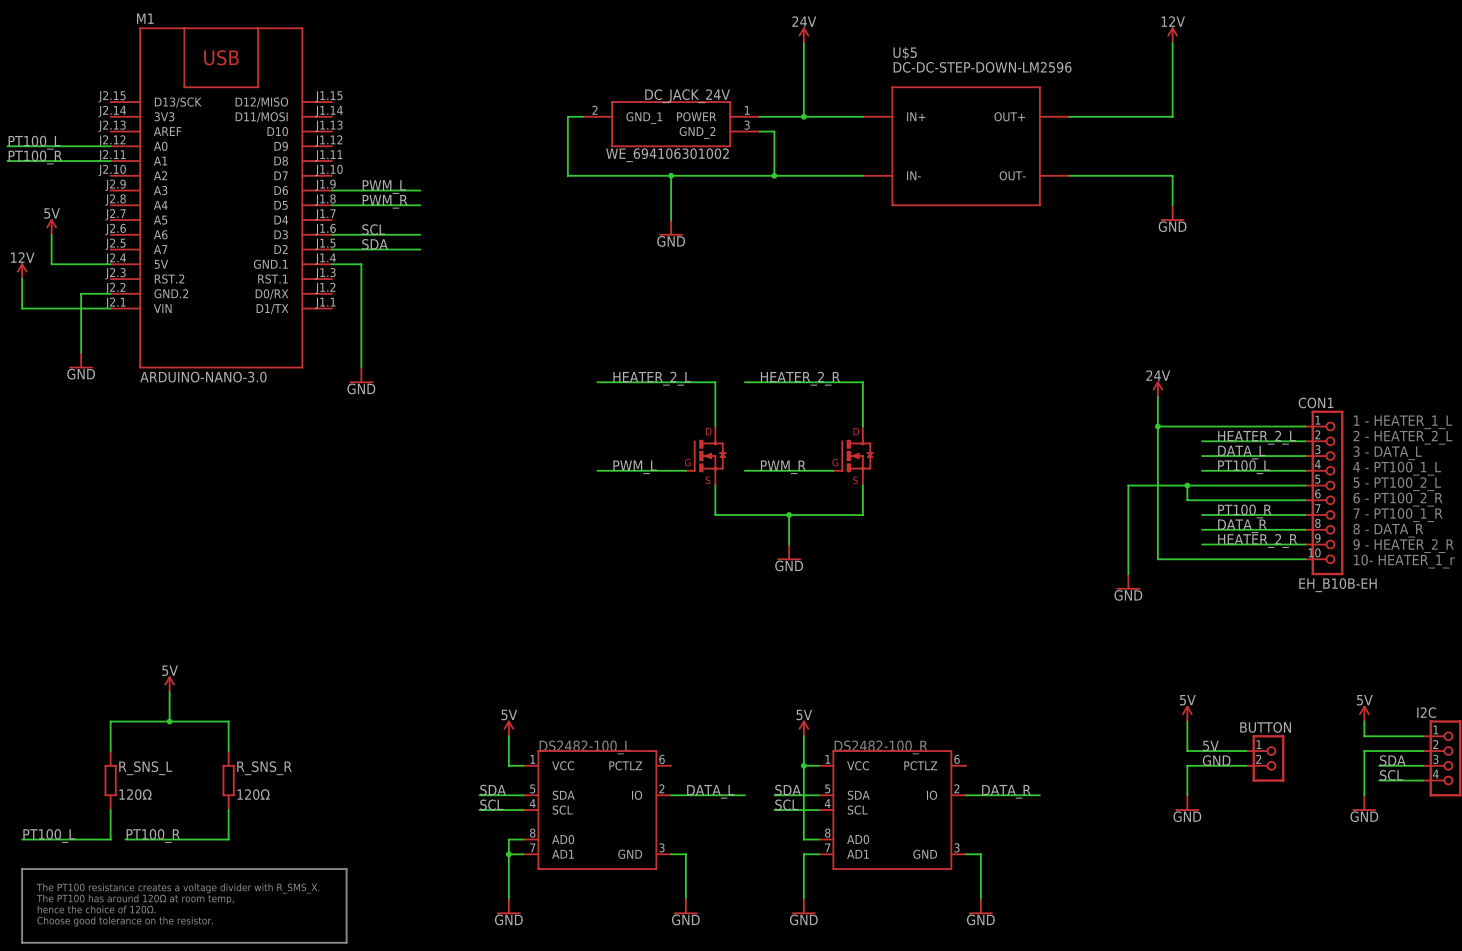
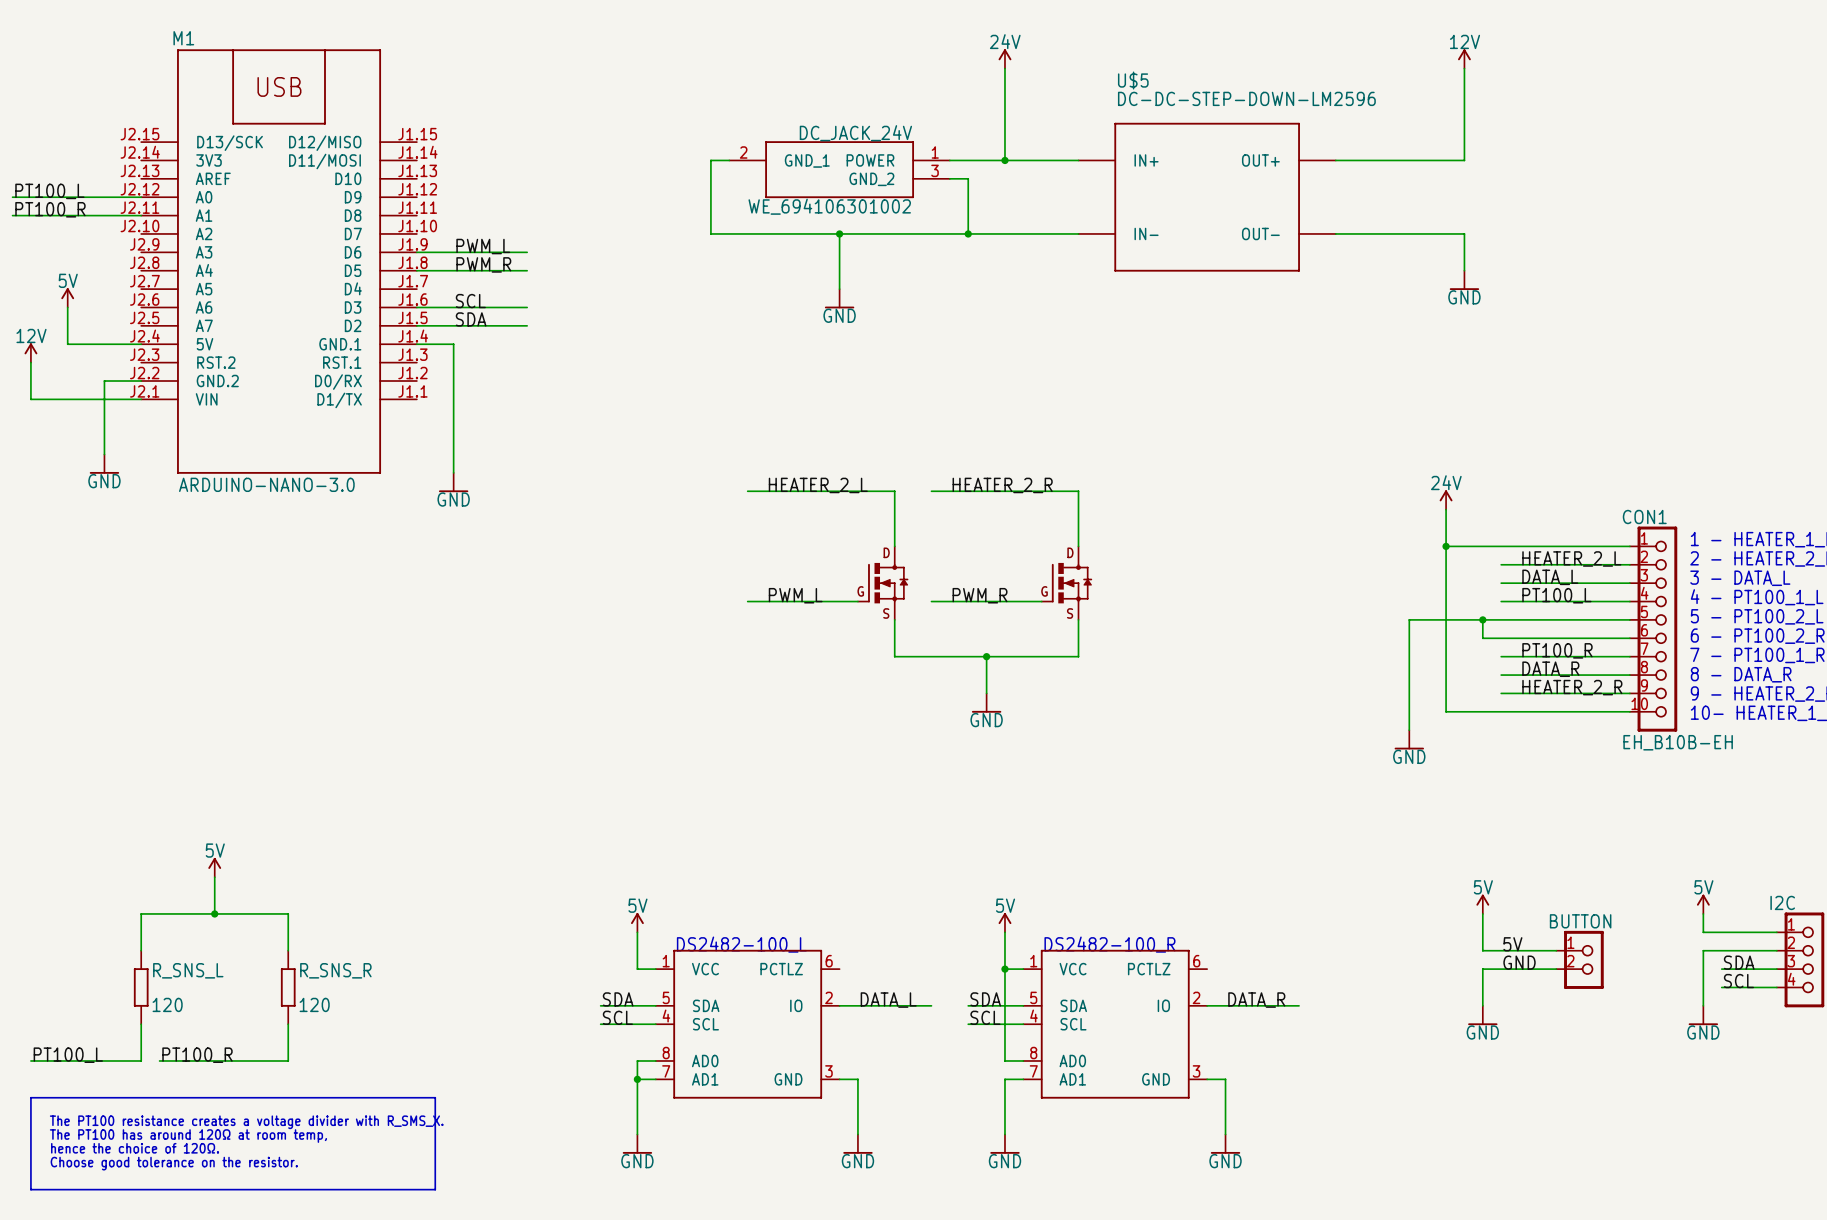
R_SNS_L value: 120Ω (135, 794) -> 120 (167, 1004)
R_SNS_R value: 120Ω (253, 794) -> 120 (314, 1004)

